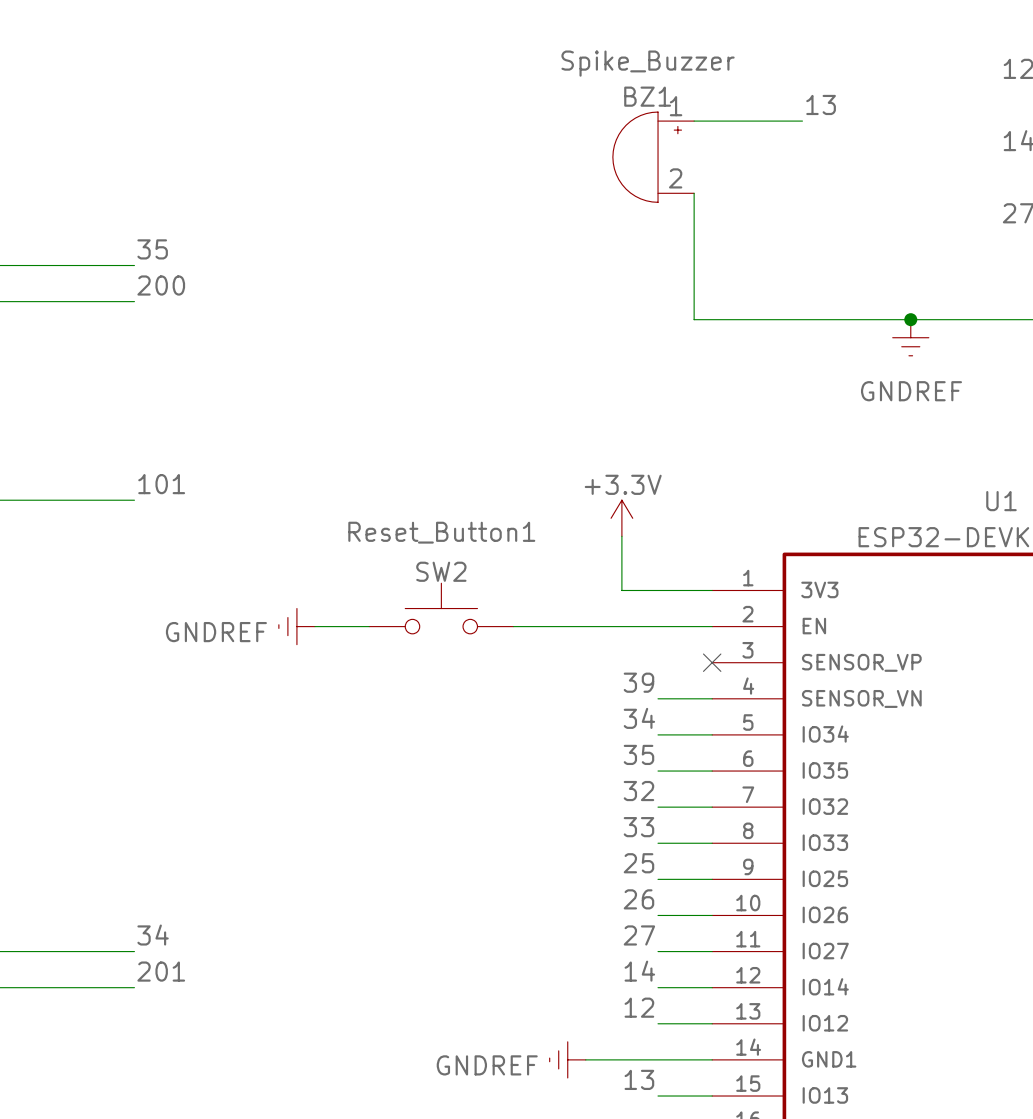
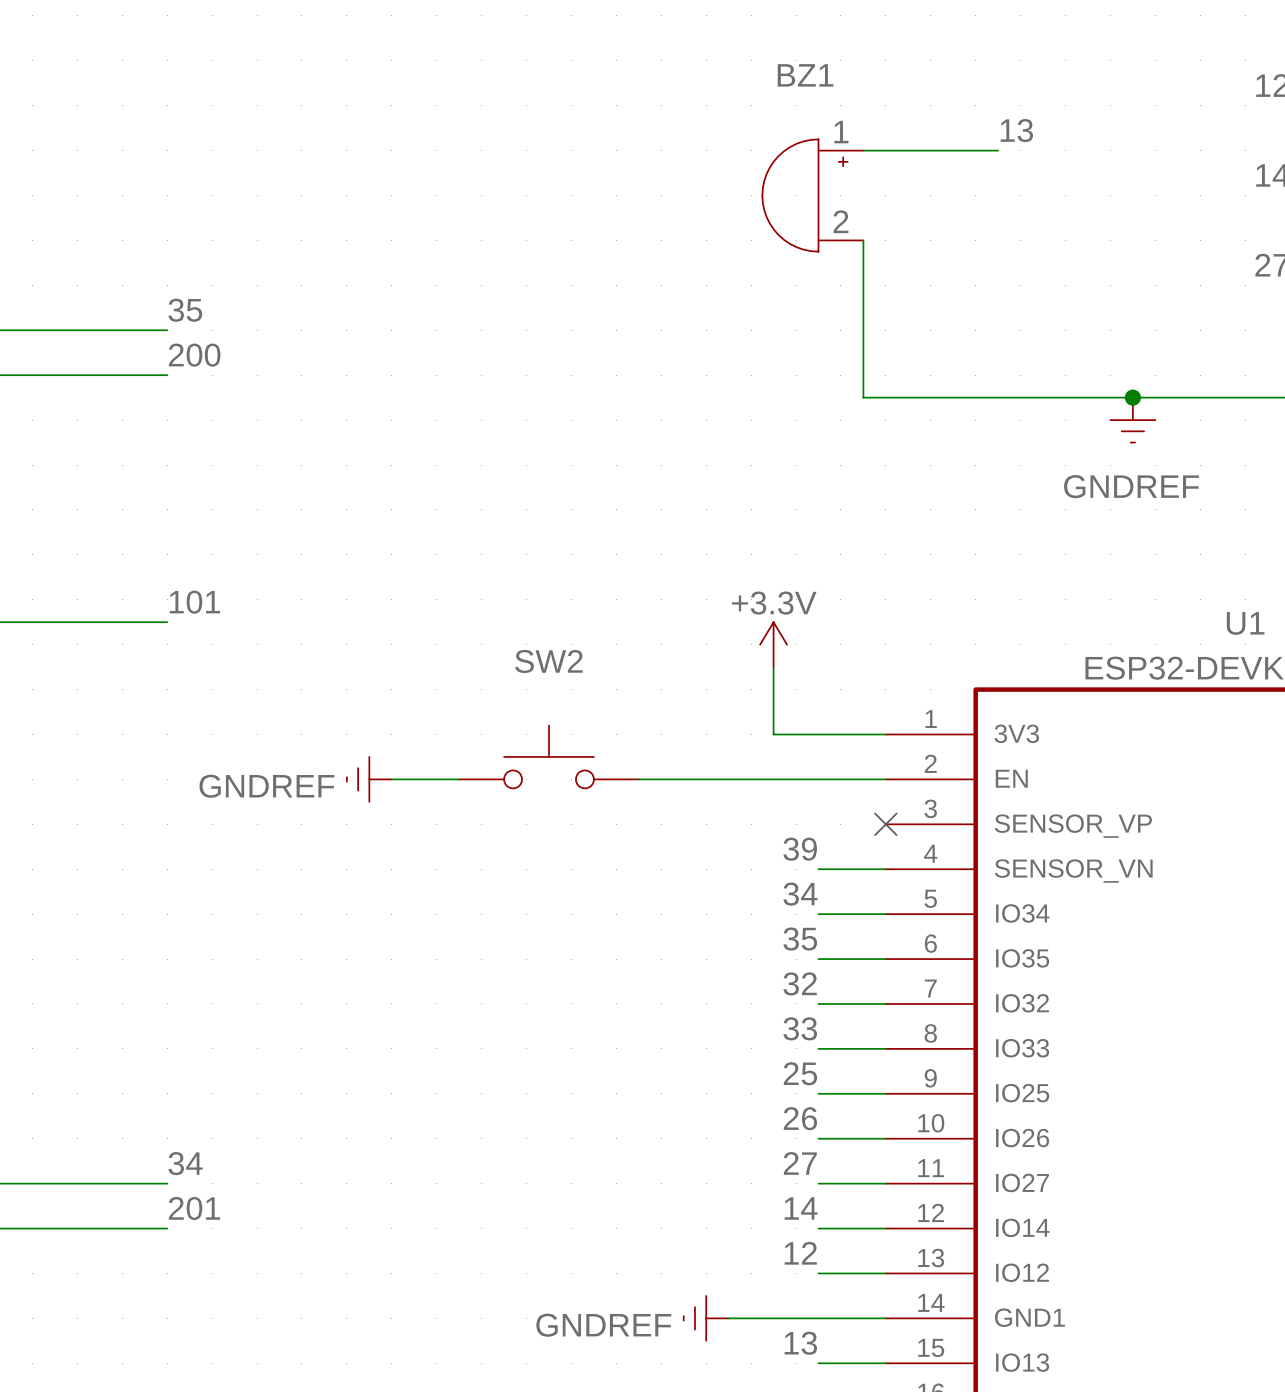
Spike_Buzzer name: Spike_Buzzer (648, 63) -> BZ1 (805, 75)
Spike_Buzzer value: BZ1 (647, 96) -> none
Reset_Button1 name: Reset_Button1 (441, 532) -> SW2 (548, 661)
Reset_Button1 value: SW2 (441, 571) -> none

